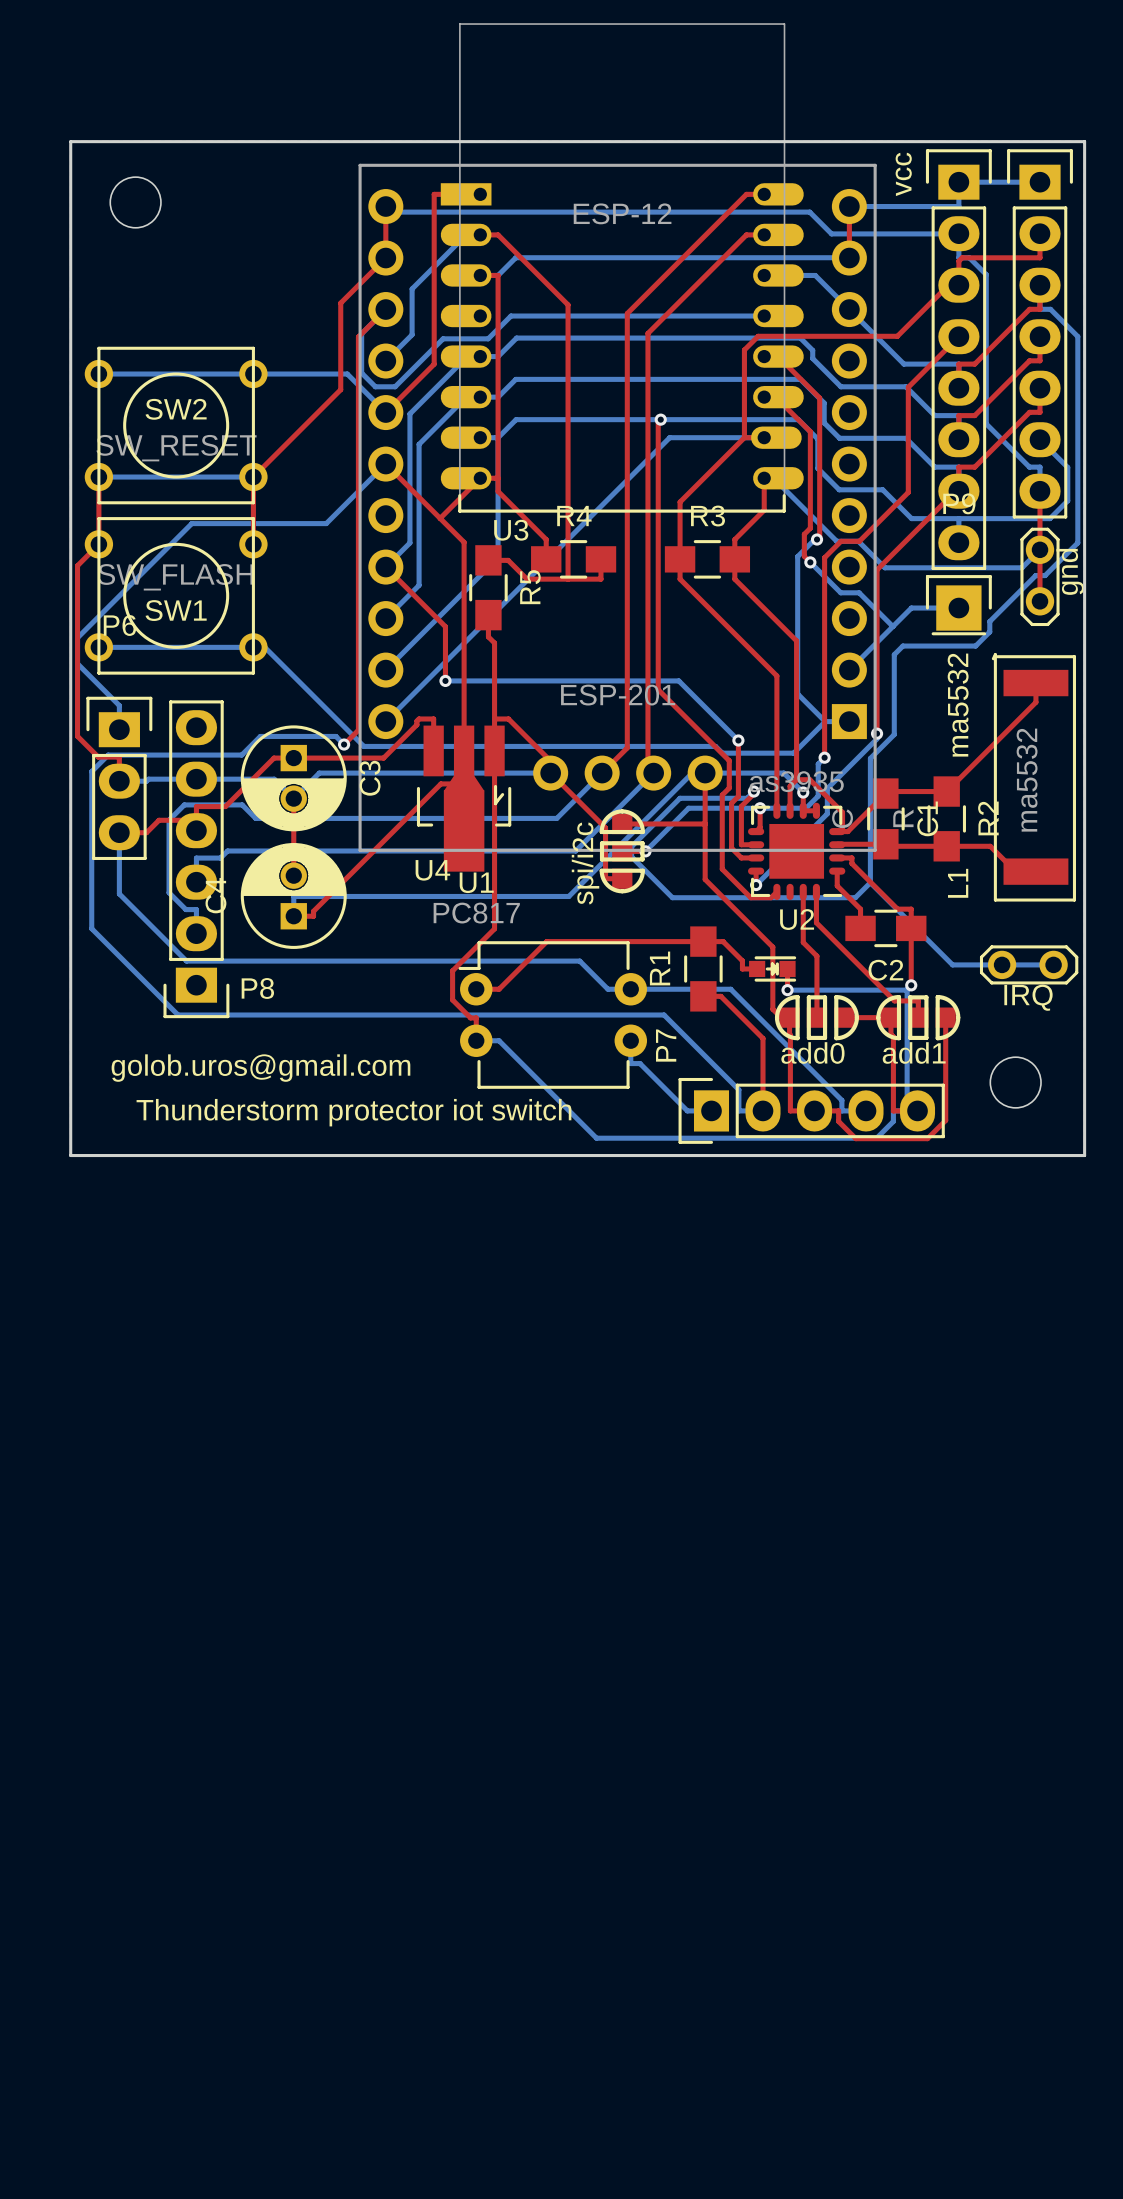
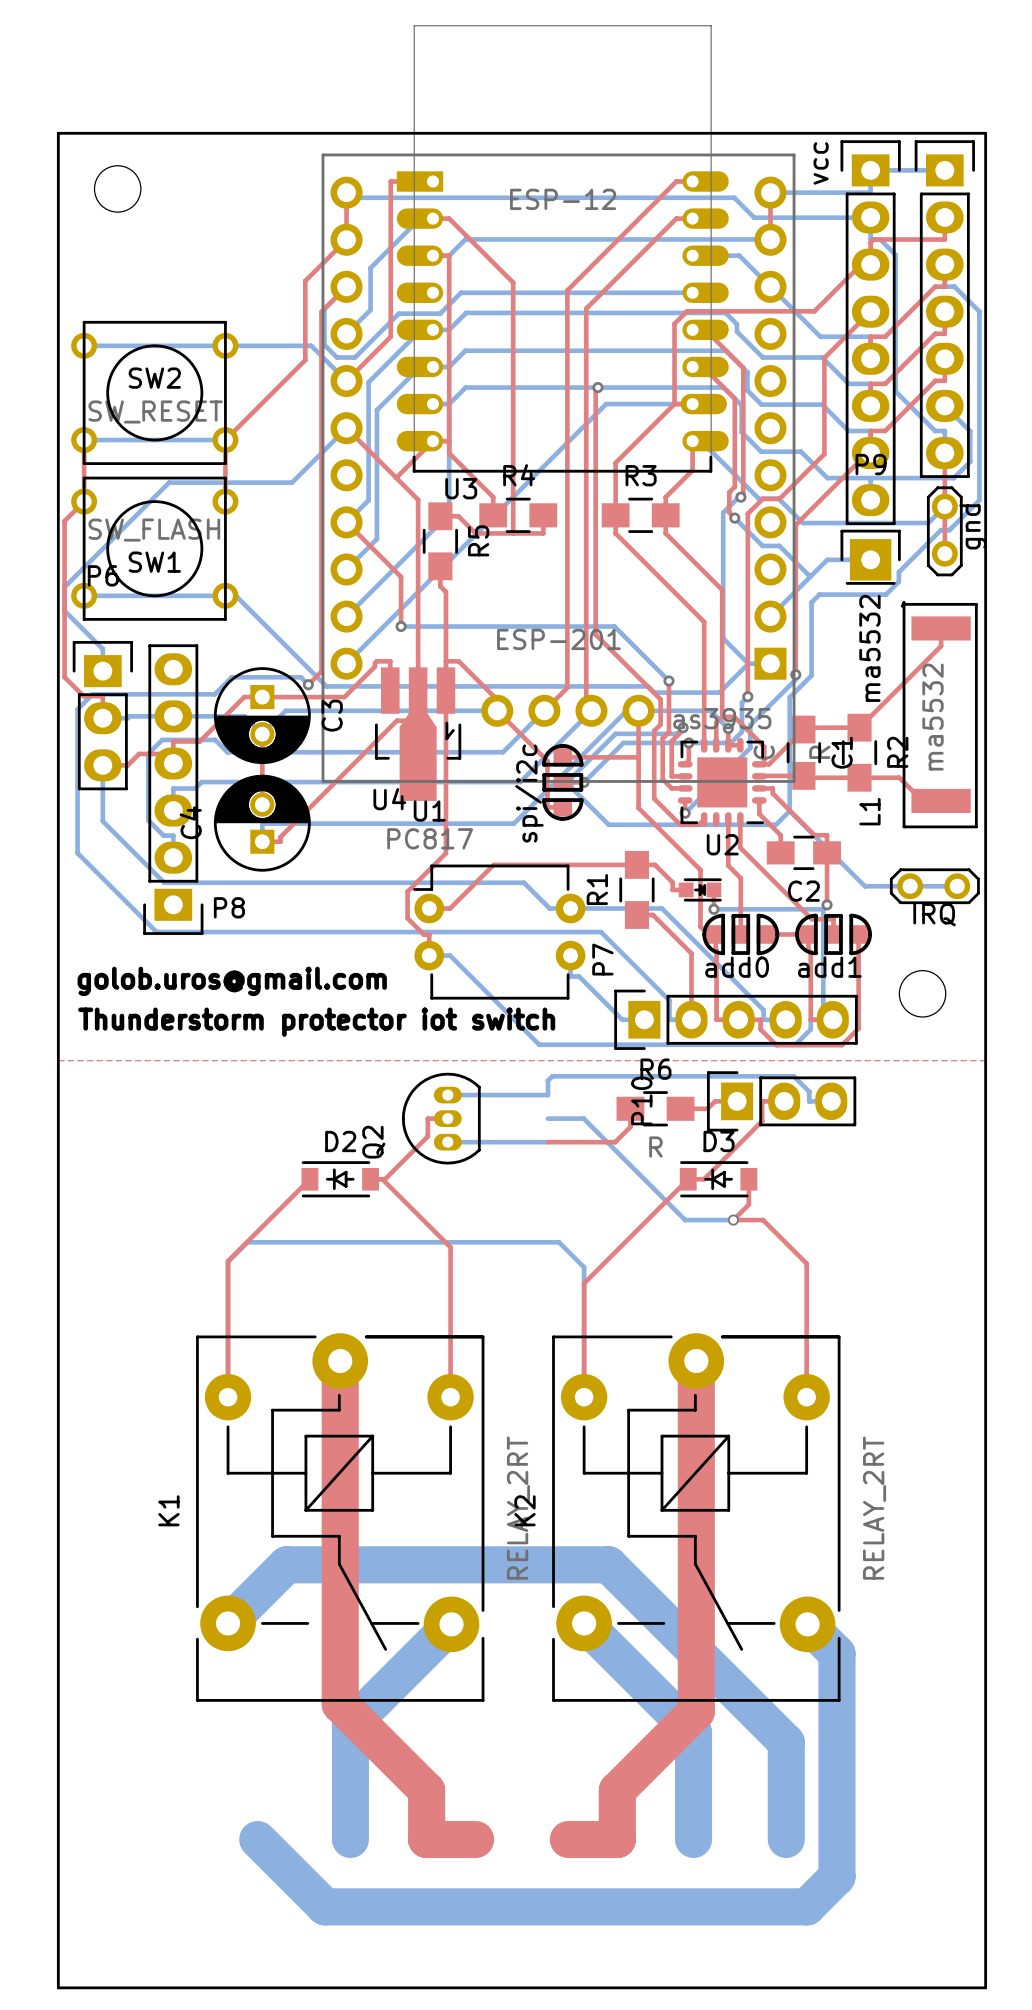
board edge: (70, 1155) (1084, 1155) -> (58, 1060) (58, 1987) (985, 1987) (985, 1060)
bottom track: none -> (447, 1095) (547, 1095) (547, 1080) (552, 1076) (793, 1076) (809, 1091) (809, 1101) (831, 1101)
top track: none -> (737, 1101) (715, 1101) (707, 1108) (680, 1108)
P10: none -> (781, 1101)
top track: none -> (784, 1101) (762, 1101) (762, 1121) (704, 1179) (688, 1179) (584, 1283) (584, 1397)
top track: none -> (630, 1108) (630, 1126) (615, 1142) (547, 1142)
R6: none -> R (655, 1108)
Q2: none -> (441, 1118)
top track: none -> (447, 1118) (427, 1118) (427, 1136) (385, 1179) (370, 1179)
bottom track: none -> (547, 1118) (583, 1118) (685, 1220) (733, 1220)
bottom track: none -> (447, 1142) (547, 1142)
top track: none -> (309, 1179) (228, 1261) (228, 1397)
D2: none -> (340, 1179)
top track: none -> (382, 1179) (450, 1247) (450, 1397)
D3: none -> (718, 1179)
top track: none -> (748, 1179) (748, 1204) (733, 1220) (763, 1220) (806, 1263) (806, 1397)
via: none -> (733, 1220)
top track: none -> (340, 1361) (340, 1704) (426, 1790) (426, 1839) (475, 1839)
top track: none -> (696, 1361) (696, 1711) (617, 1790) (617, 1839) (568, 1839)
bottom track: none -> (228, 1397) (228, 1261) (247, 1242) (559, 1242) (584, 1267) (584, 1397)
K1: none -> RELAY_2RT (340, 1517)
K2: none -> RELAY_2RT (696, 1517)
bottom track: none -> (228, 1623) (286, 1564) (608, 1564) (786, 1742) (786, 1839)
bottom track: none -> (584, 1623) (693, 1732) (693, 1839)
bottom track: none -> (451, 1624) (350, 1725) (350, 1839)
bottom track: none -> (807, 1624) (836, 1653) (836, 1876) (806, 1906) (325, 1906) (257, 1839)

